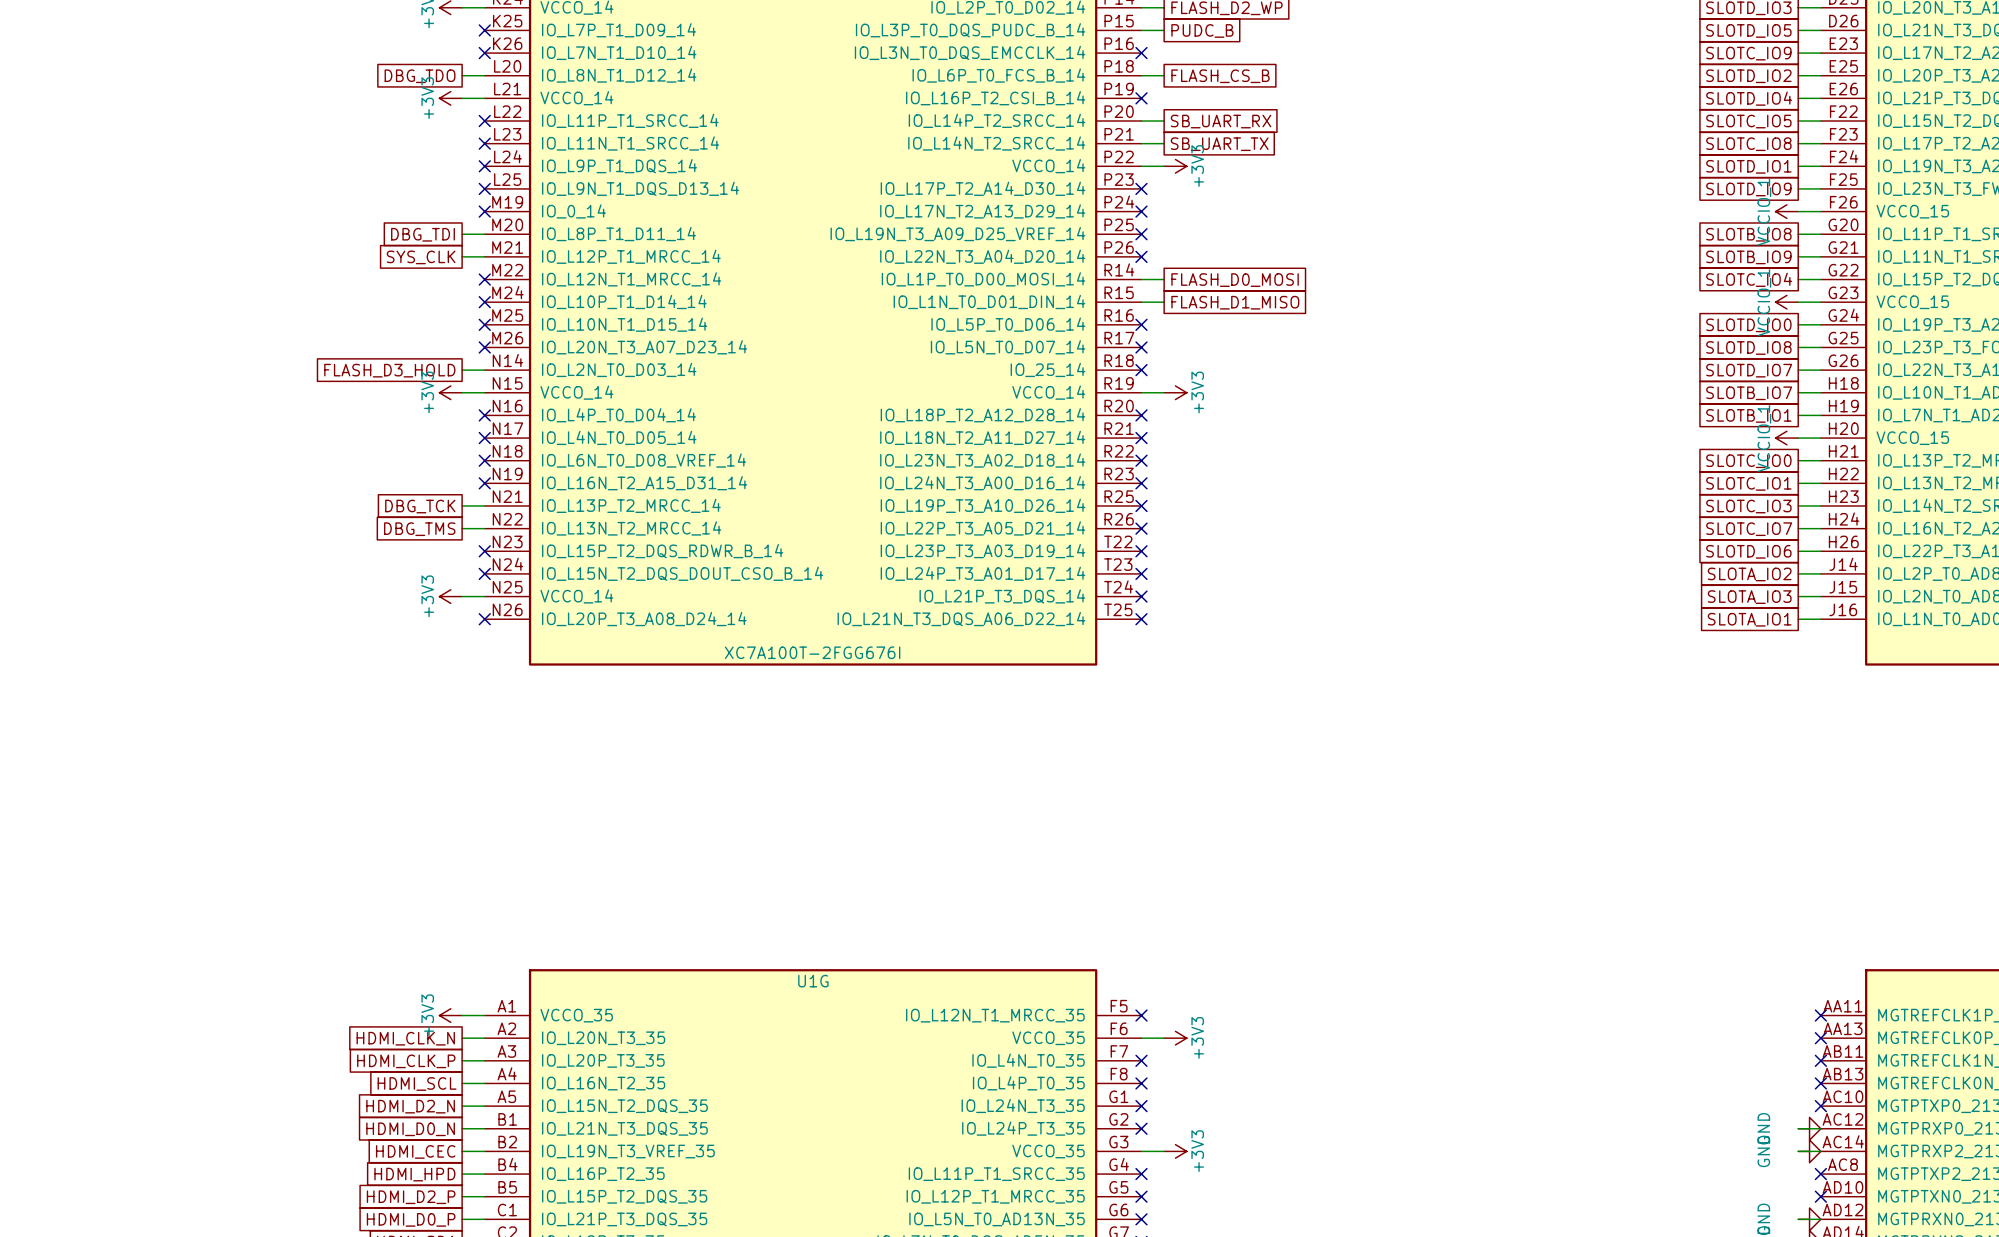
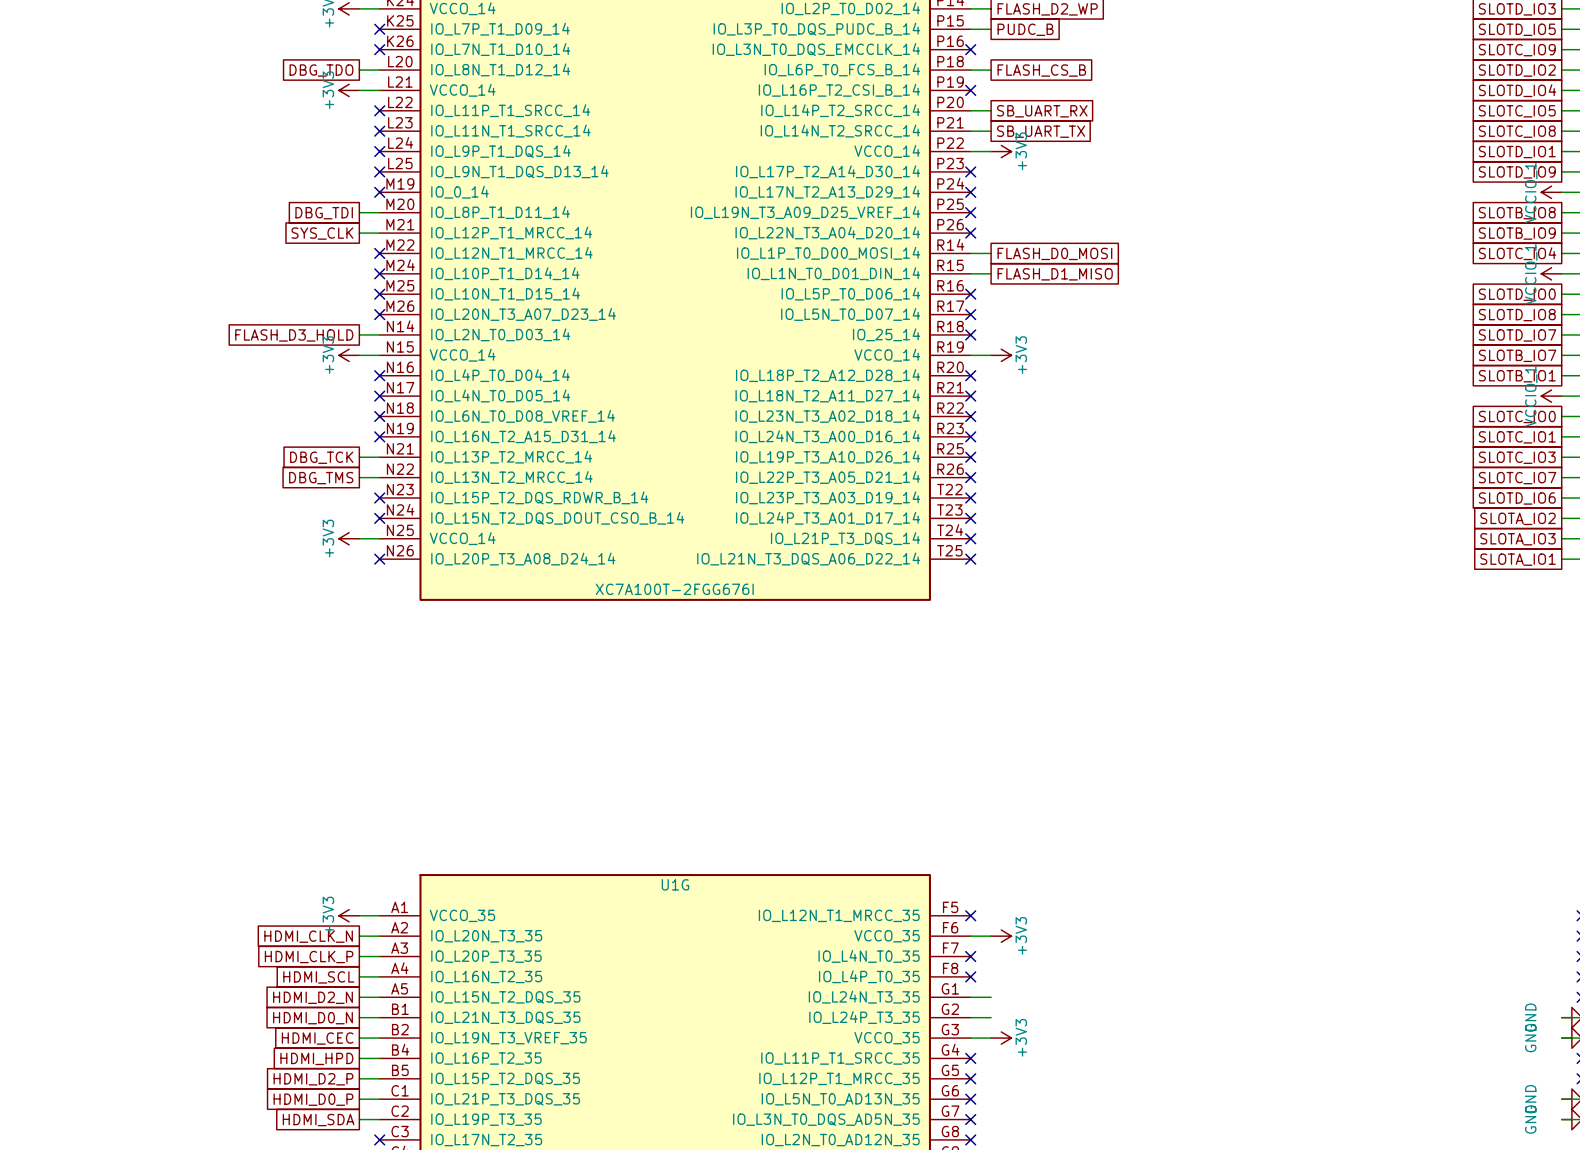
wire: none -> (970, 997) (991, 997)
no-connect mark: (1141, 1106) -> none
wire: none -> (970, 1017) (991, 1017)
no-connect mark: (1141, 1128) -> none

